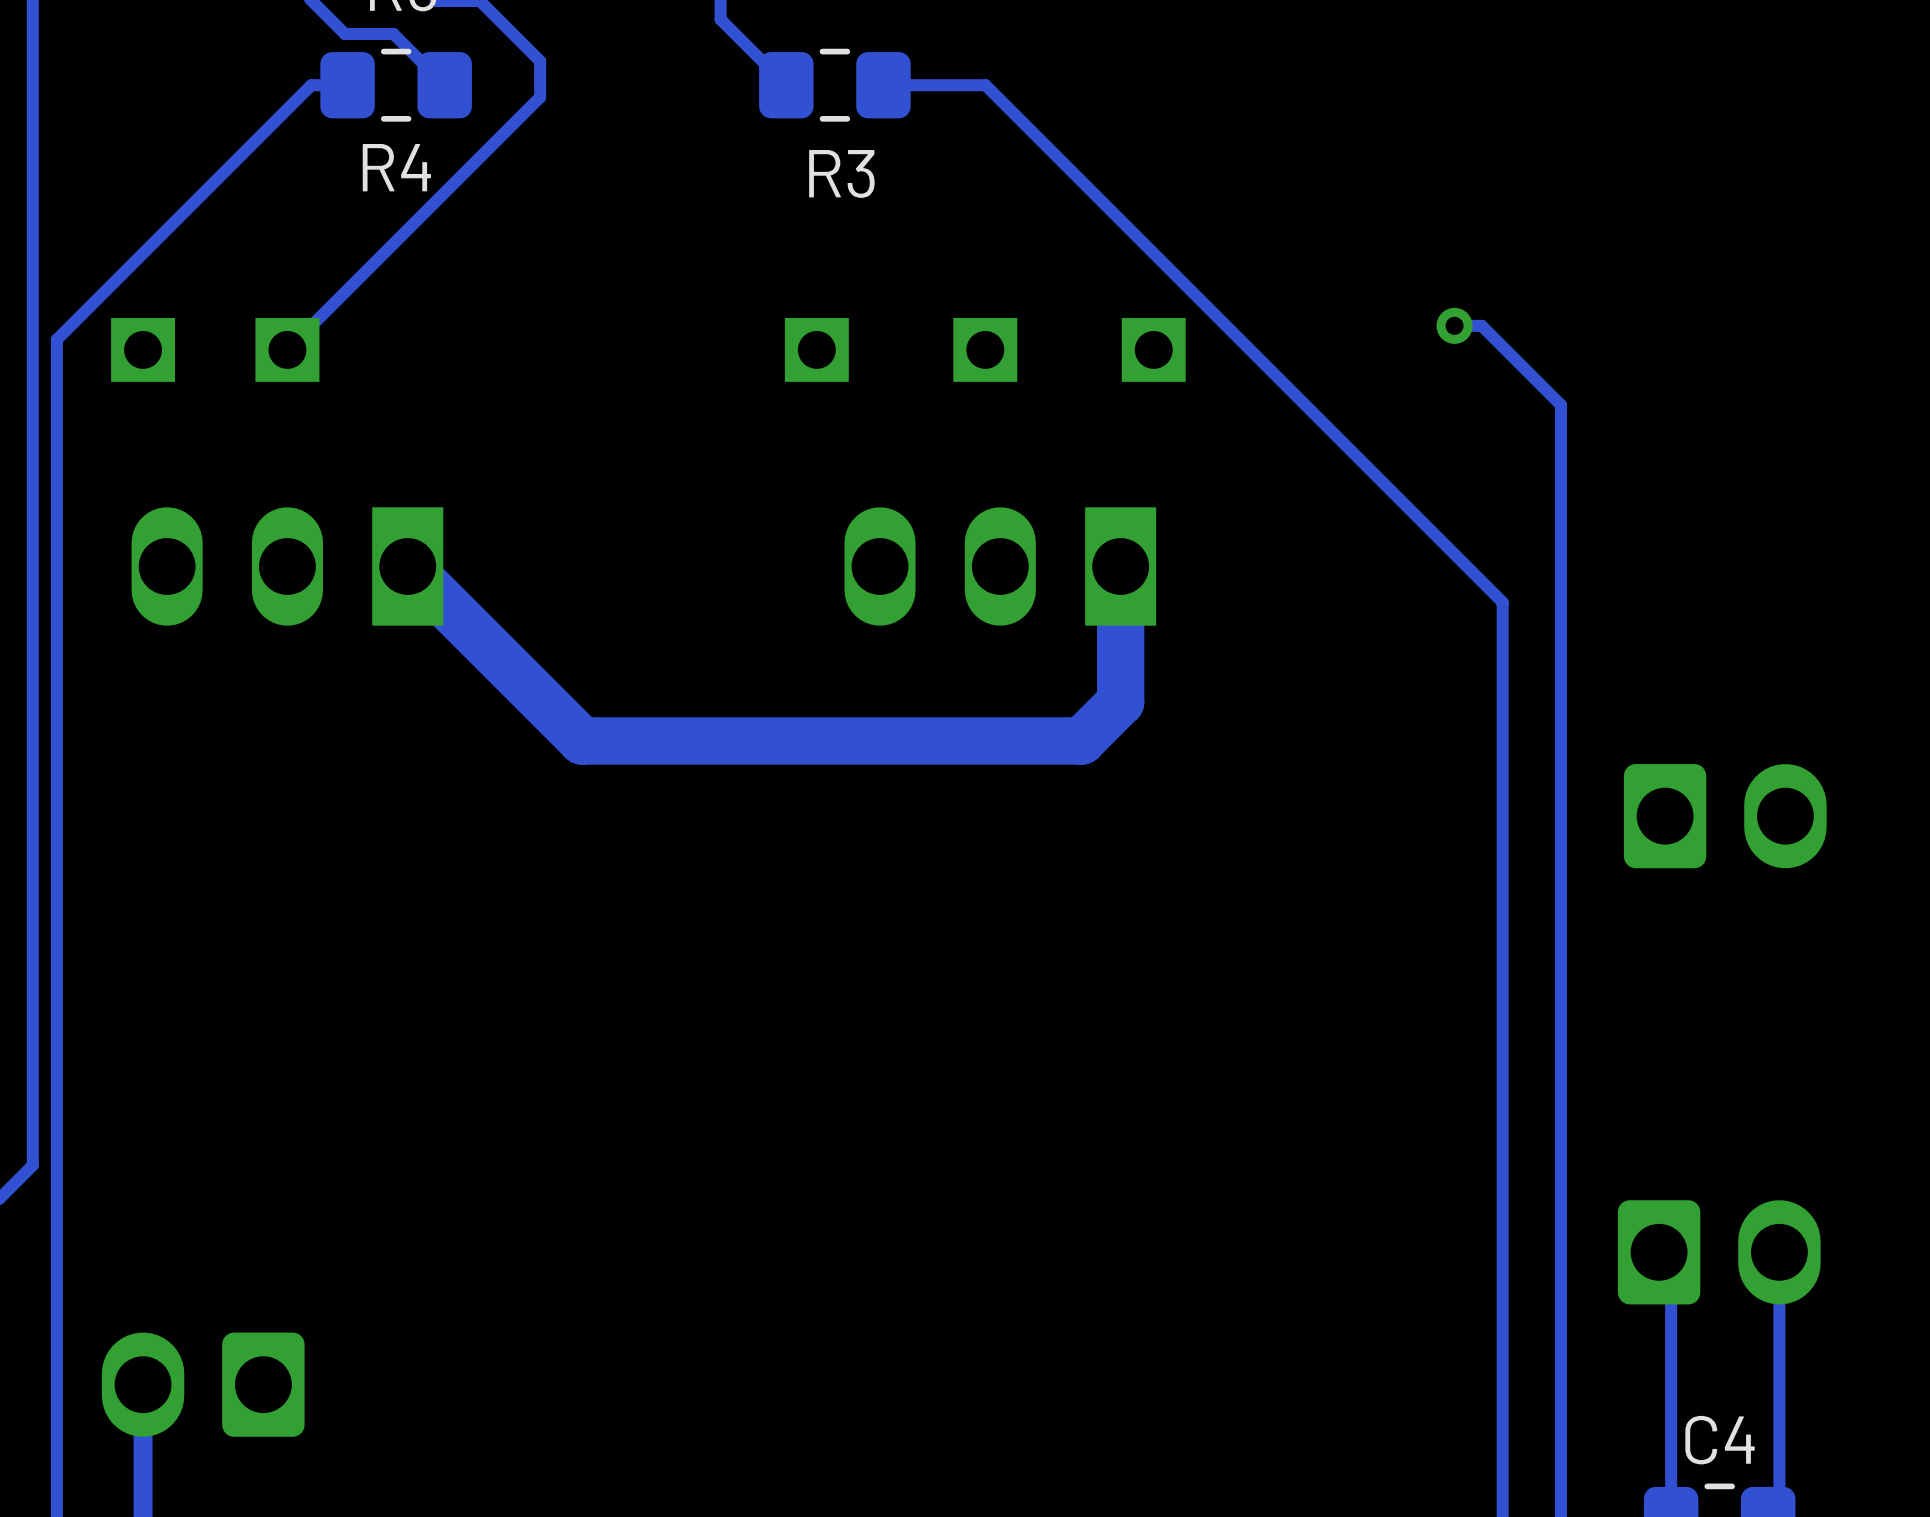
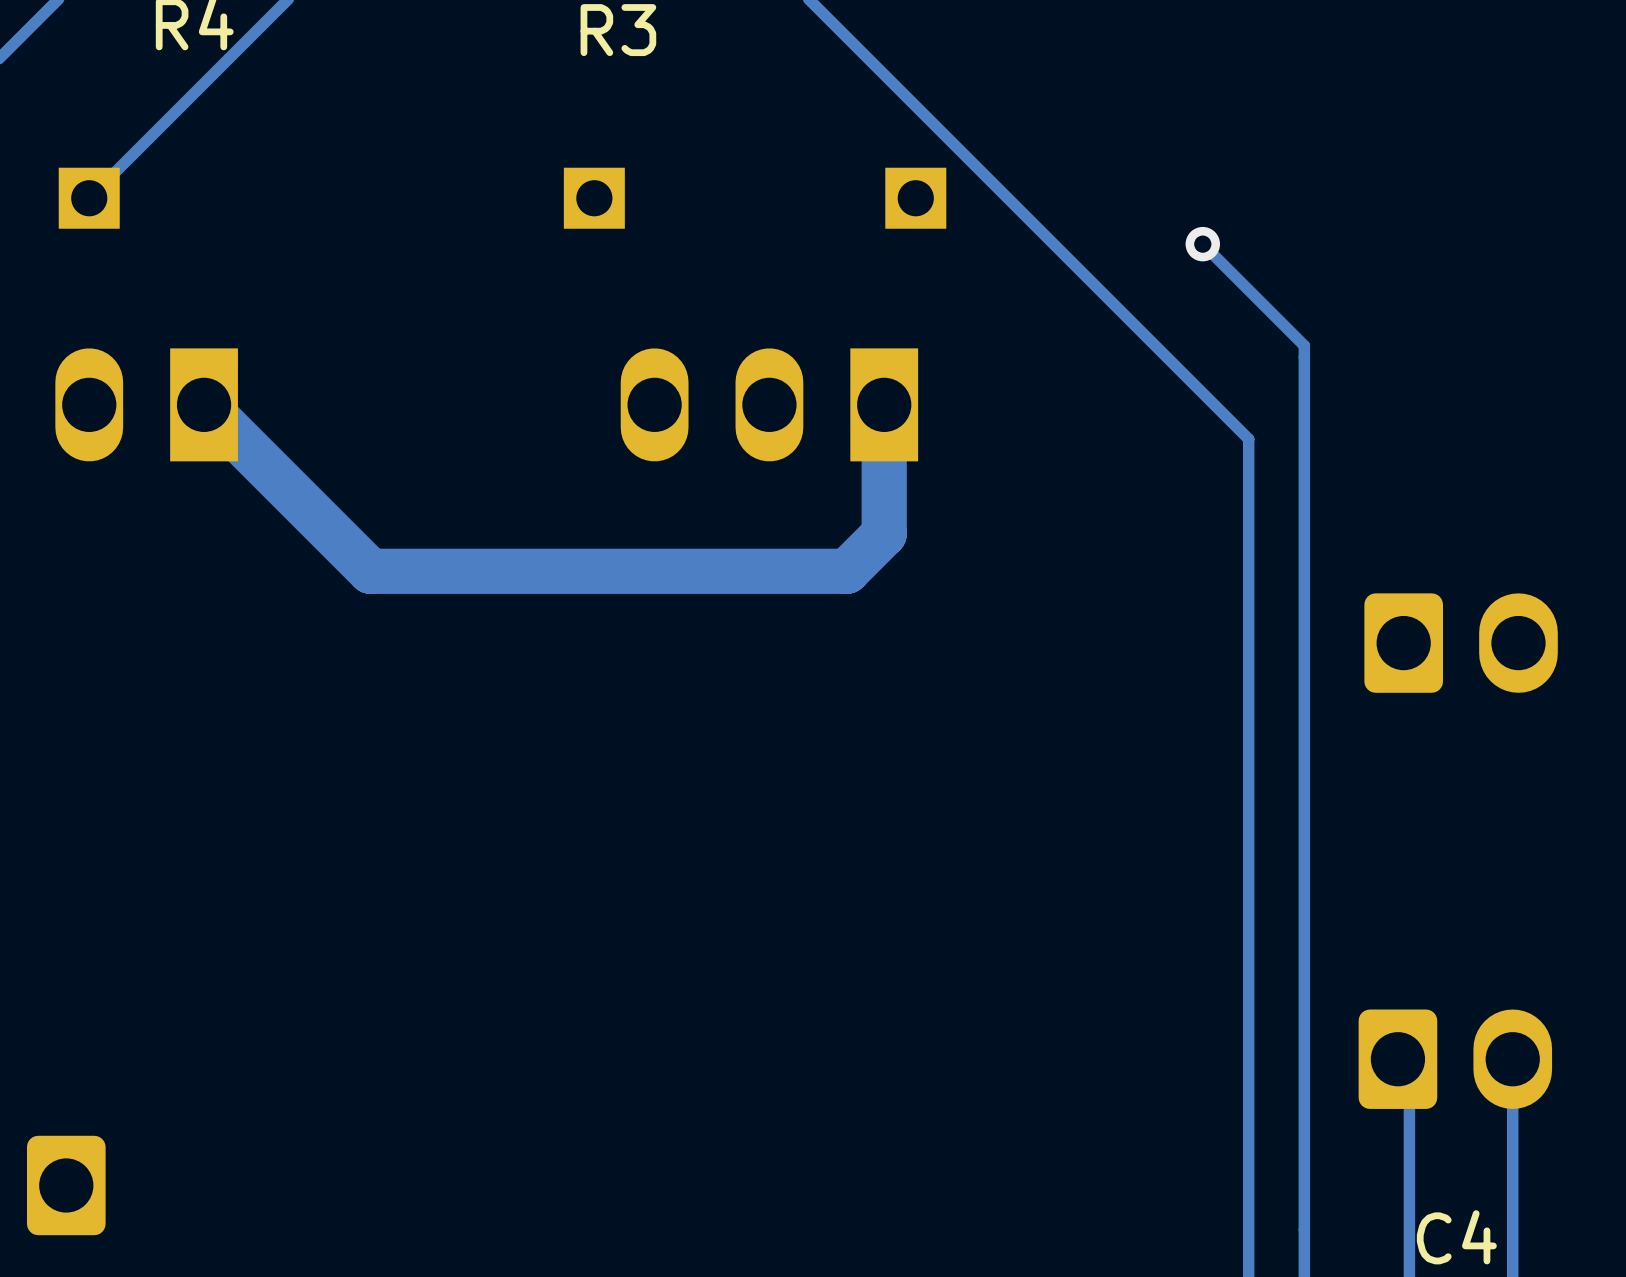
track: (1454, 325) (1481, 325) (1560, 405) (1560, 504) -> (1202, 244) (1304, 345)
via position: (1454, 325) -> (1202, 244)
part: (985, 349) -> none

